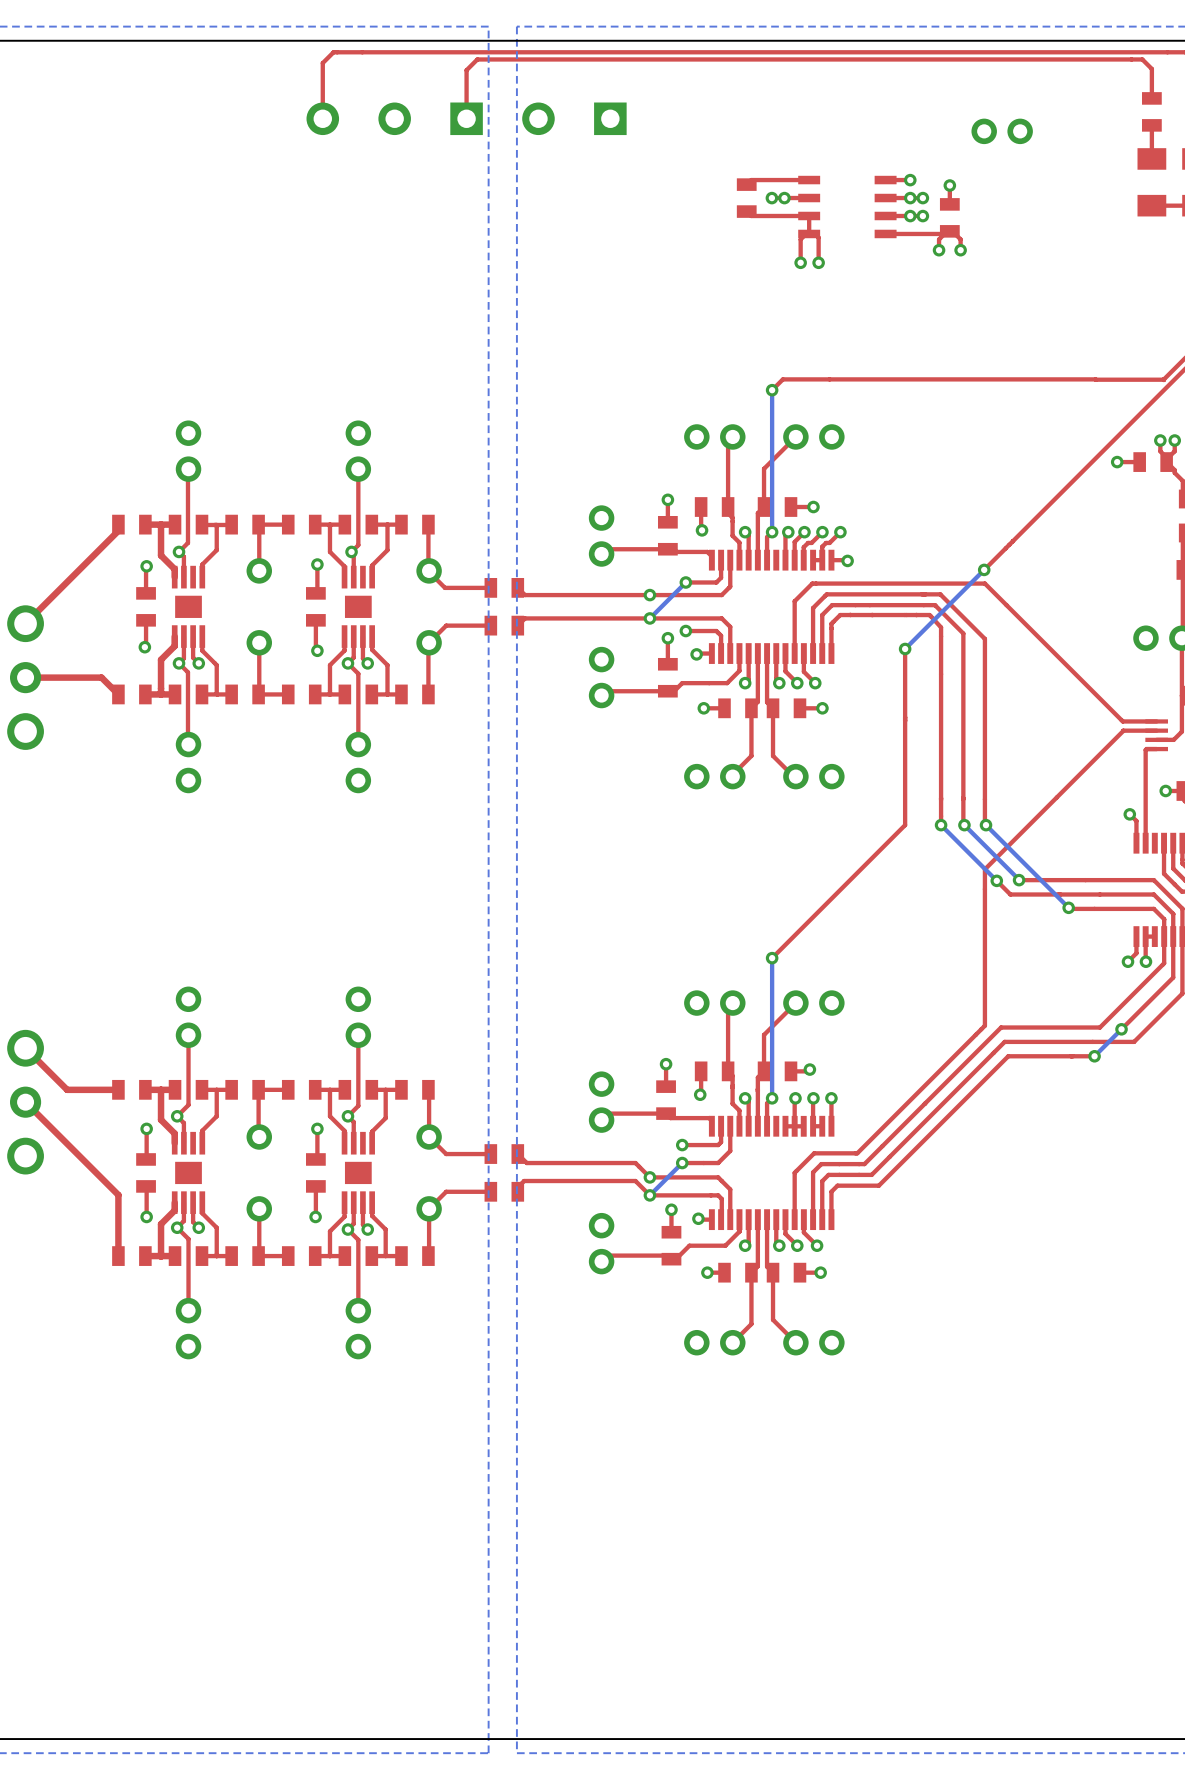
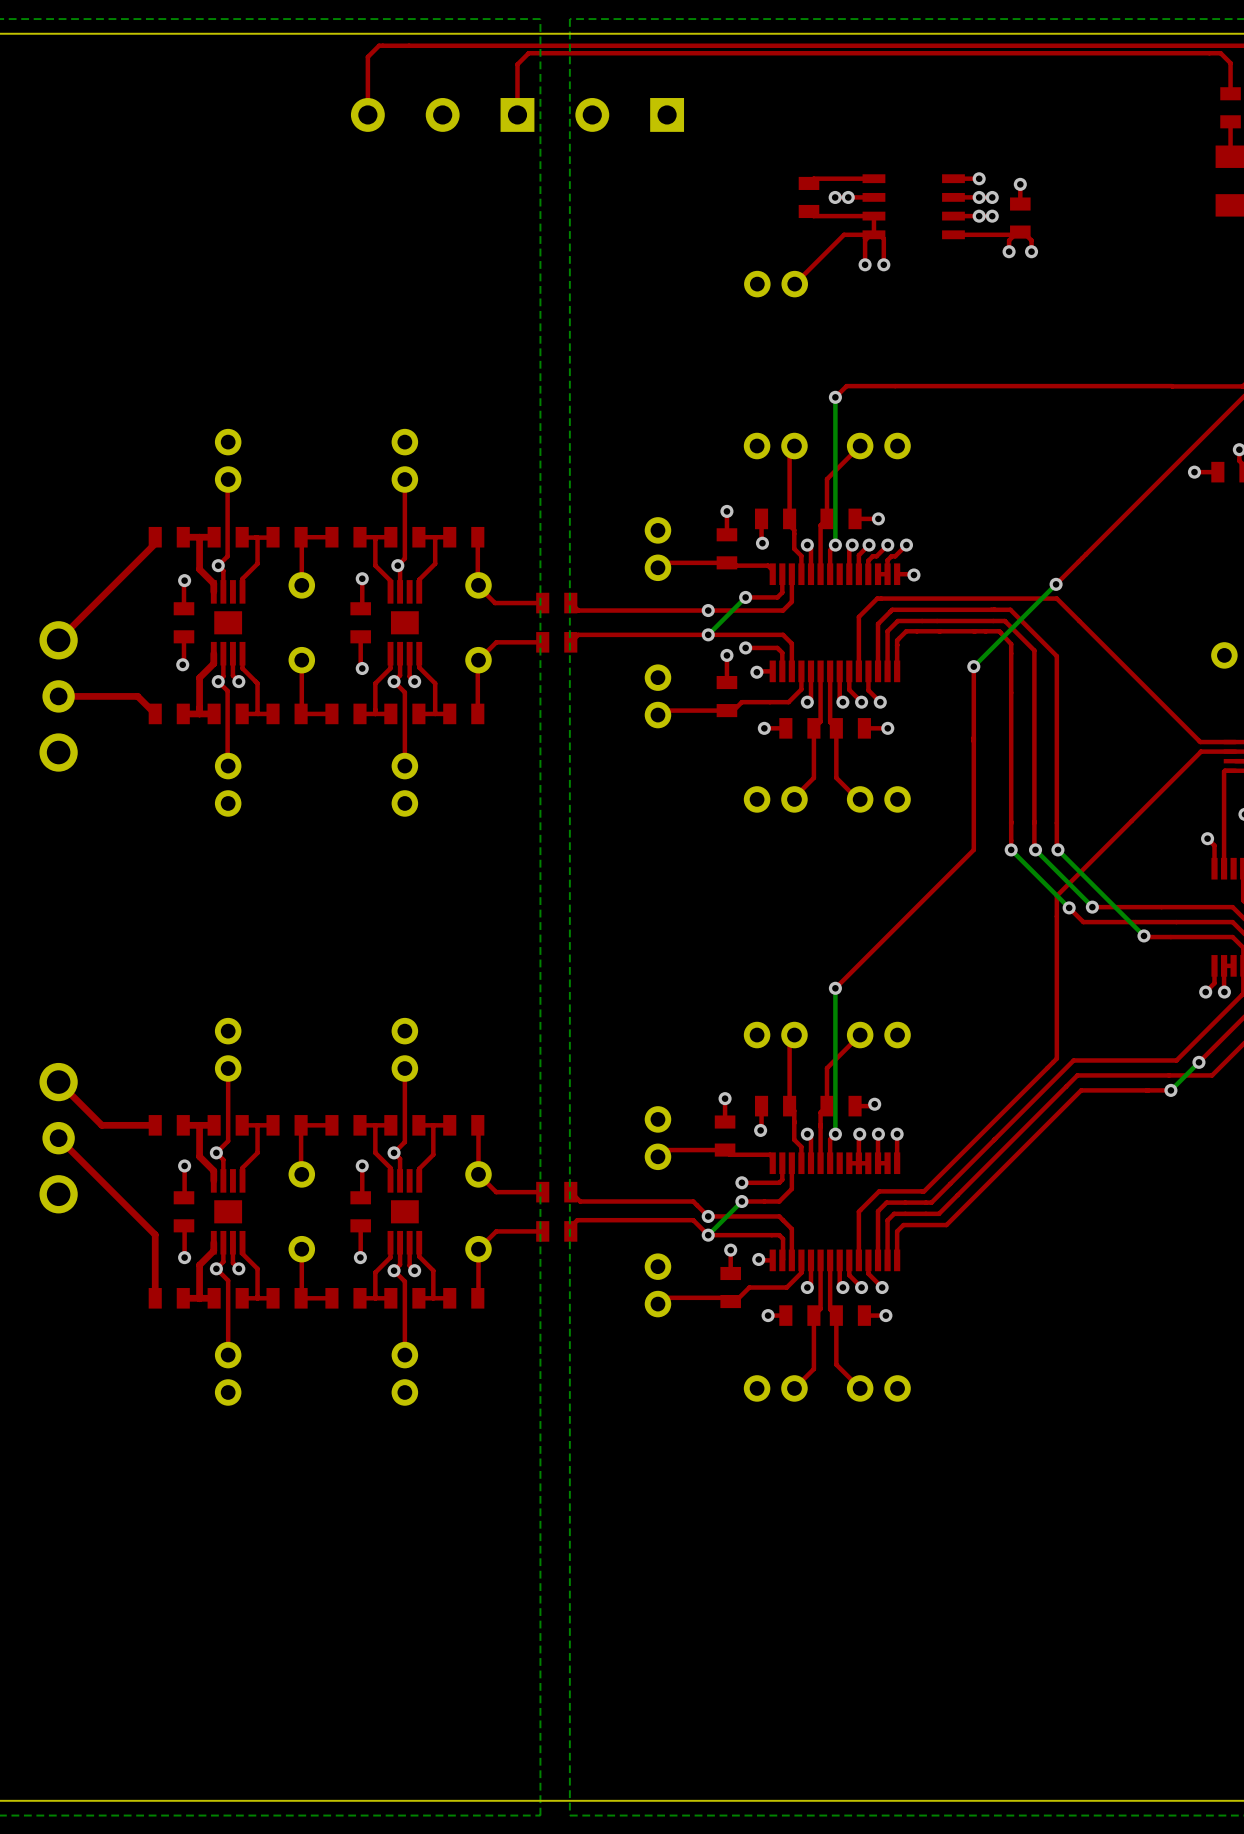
part position: (1002, 131) -> (776, 284)
top track: none -> (870, 234) (844, 234) (794, 284)

